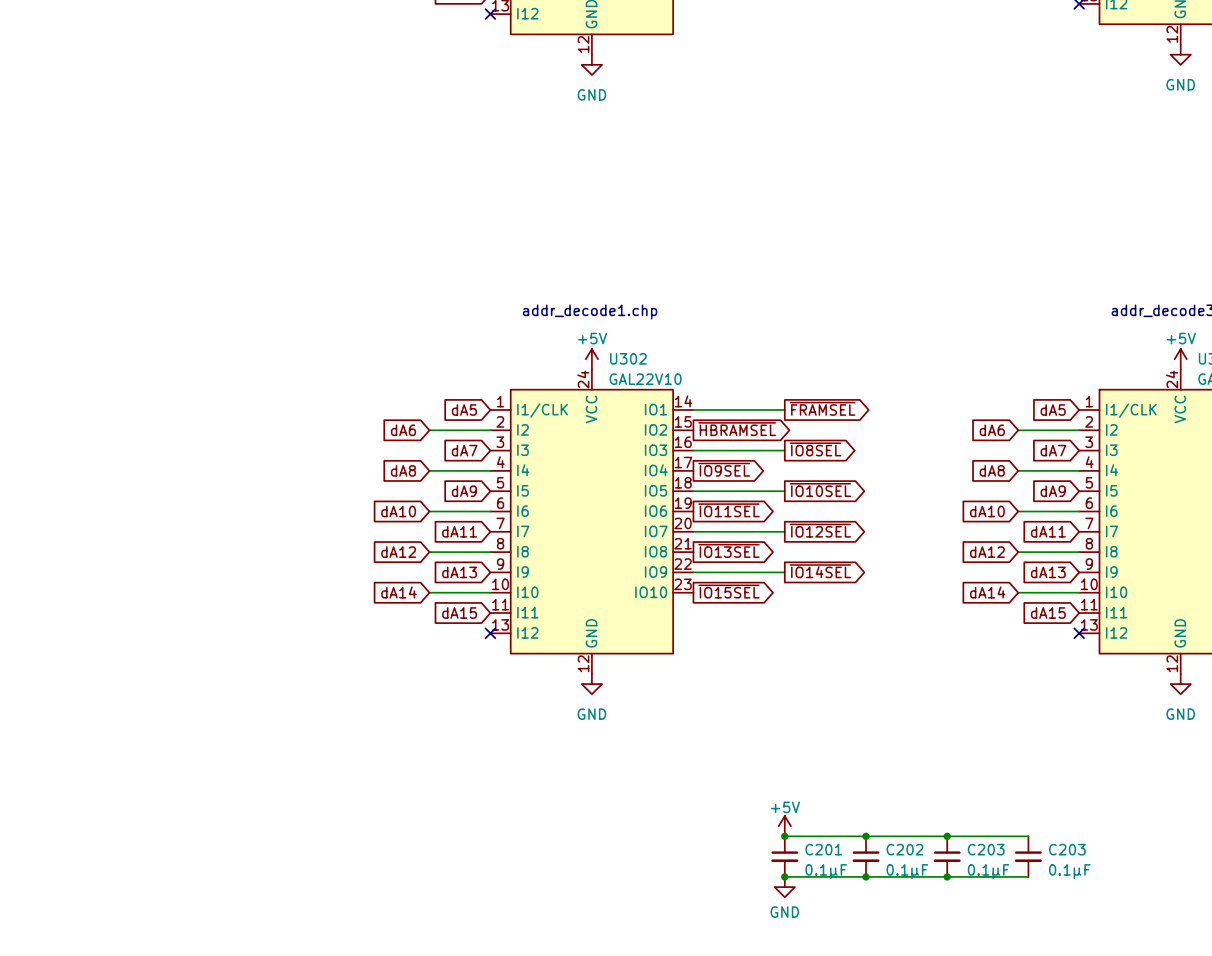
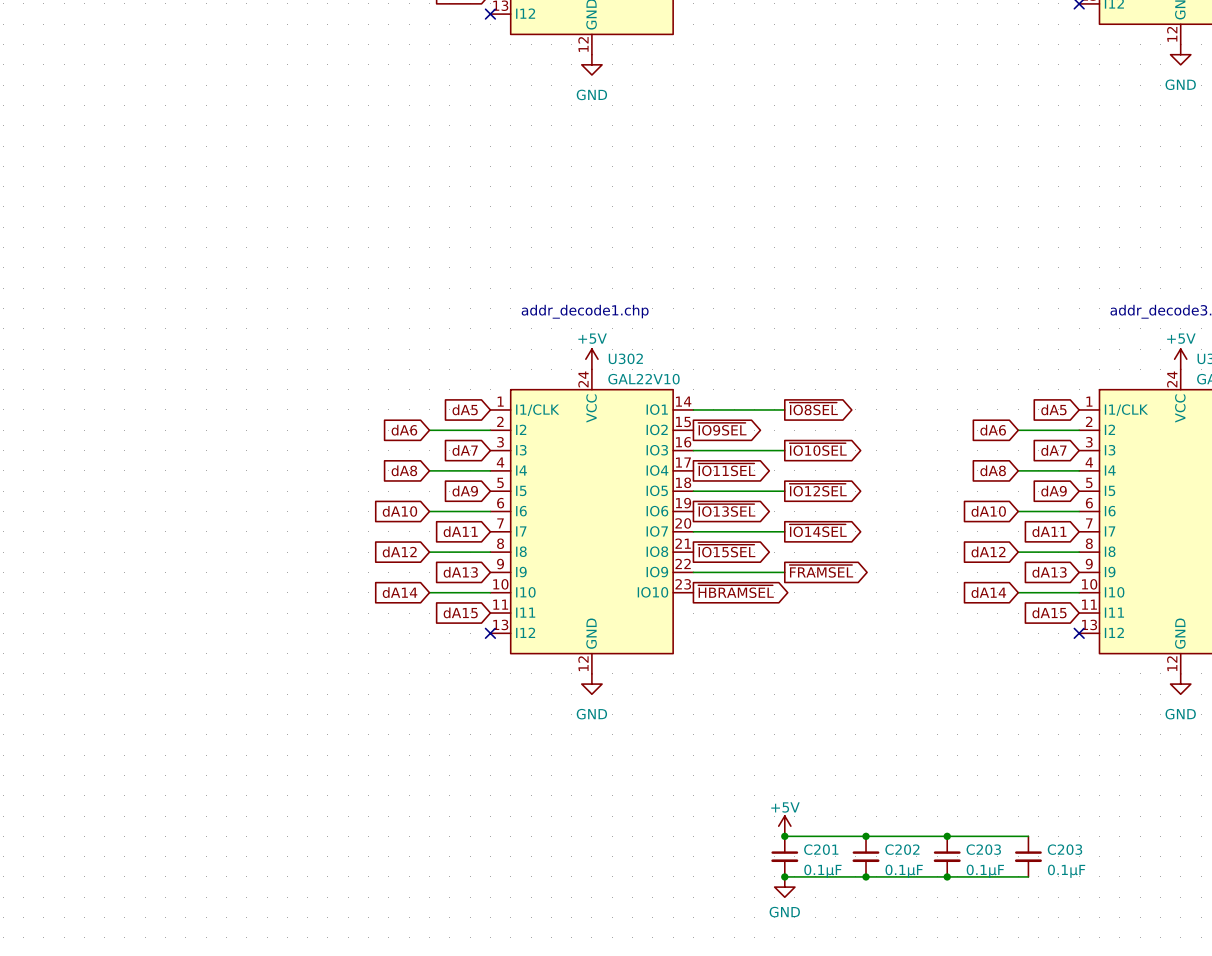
global label: ~{FRAMSEL} (822, 408) -> ~{IO8SEL} (813, 408)
global label: ~{HBRAMSEL} (737, 429) -> ~{IO9SEL} (722, 429)
global label: ~{IO8SEL} (815, 449) -> ~{IO10SEL} (818, 449)
global label: ~{IO9SEL} (724, 469) -> ~{IO11SEL} (726, 469)
global label: ~{IO10SEL} (820, 490) -> ~{IO12SEL} (818, 490)
global label: ~{IO11SEL} (729, 510) -> ~{IO13SEL} (726, 510)
global label: ~{IO12SEL} (820, 530) -> ~{IO14SEL} (818, 530)
global label: ~{IO13SEL} (729, 550) -> ~{IO15SEL} (726, 551)
global label: ~{IO14SEL} (820, 571) -> ~{FRAMSEL} (821, 571)
global label: ~{IO15SEL} (729, 591) -> ~{HBRAMSEL} (736, 591)

